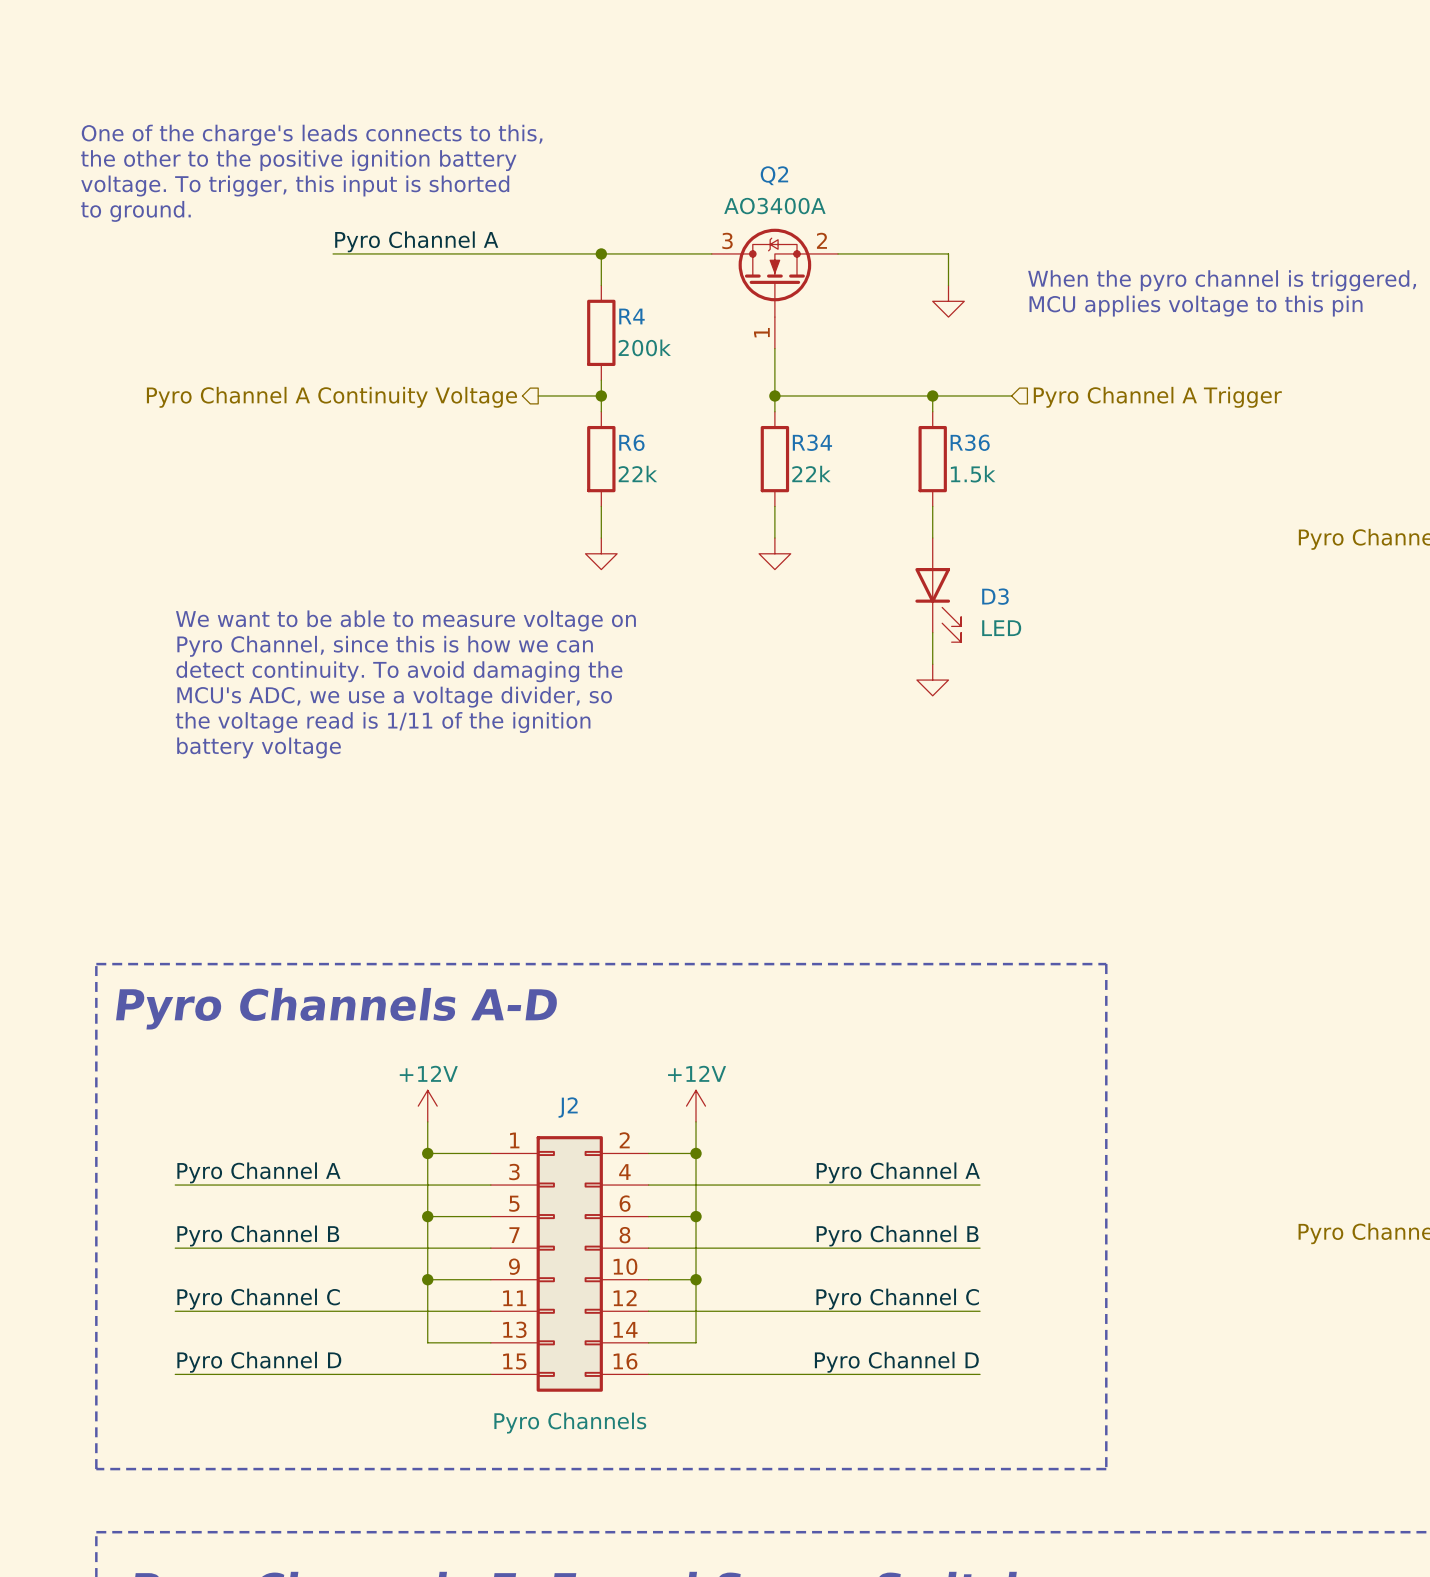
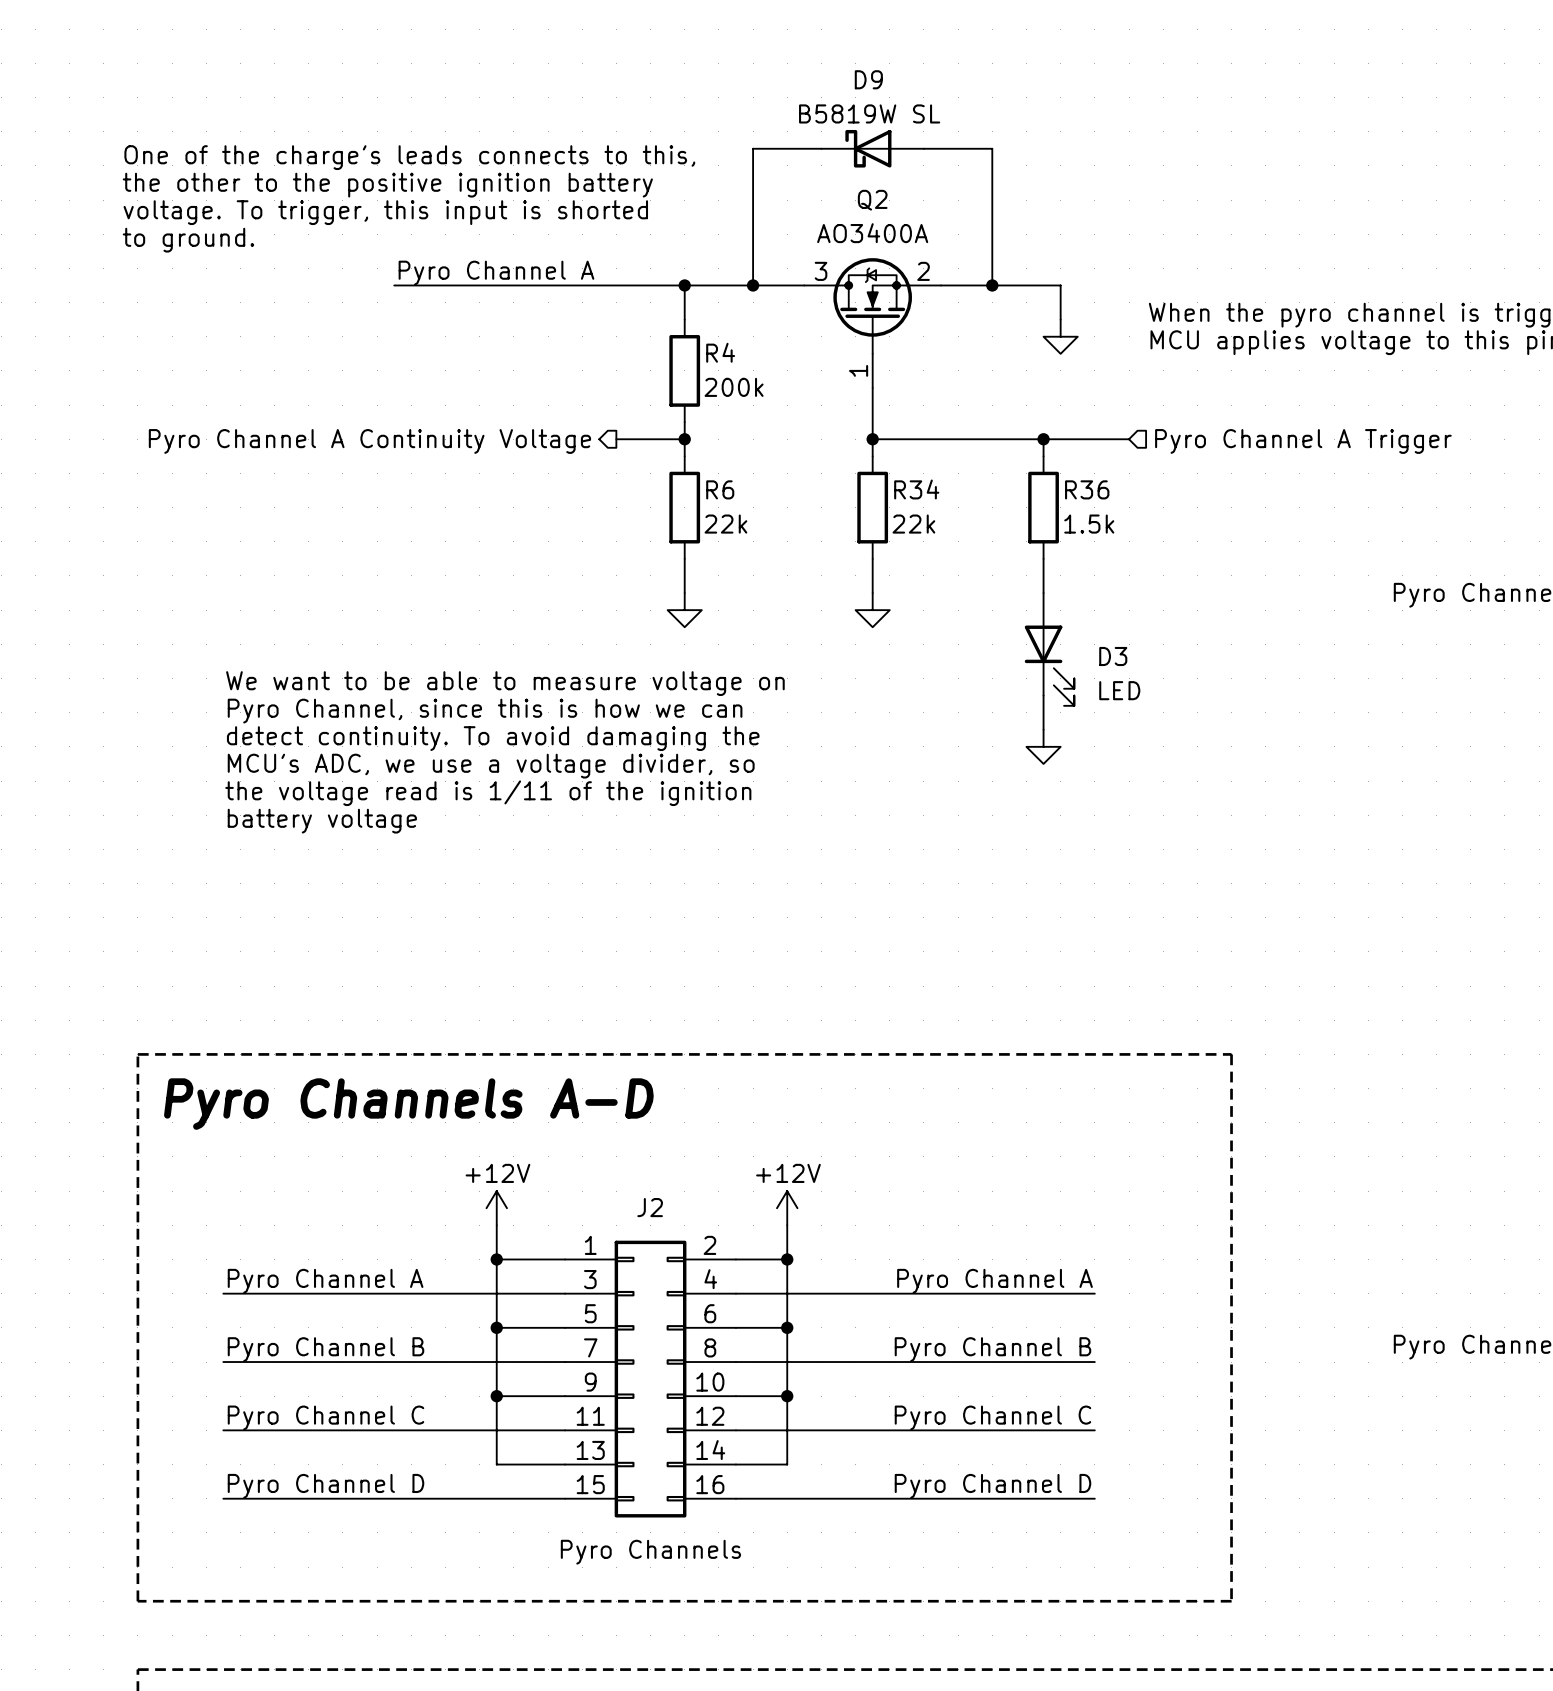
wire: none -> (821, 148) (753, 148) (753, 285)
D9: none -> B5819W SL (872, 148)
wire: none -> (923, 148) (992, 148) (992, 285)
junction: none -> (753, 285)
junction: none -> (992, 285)

